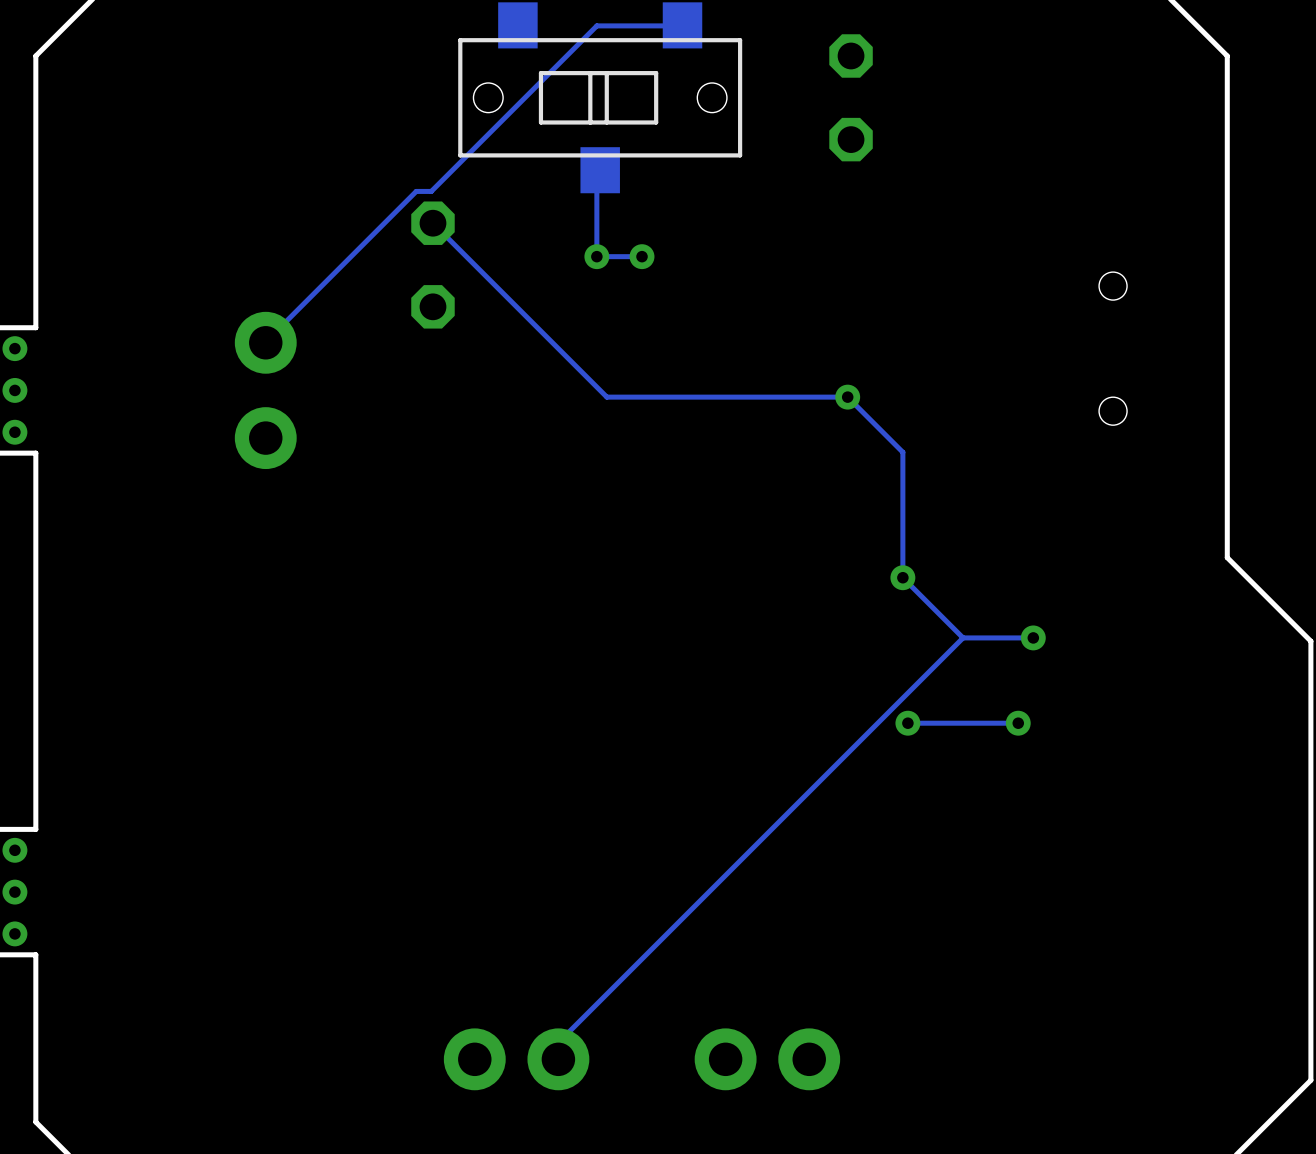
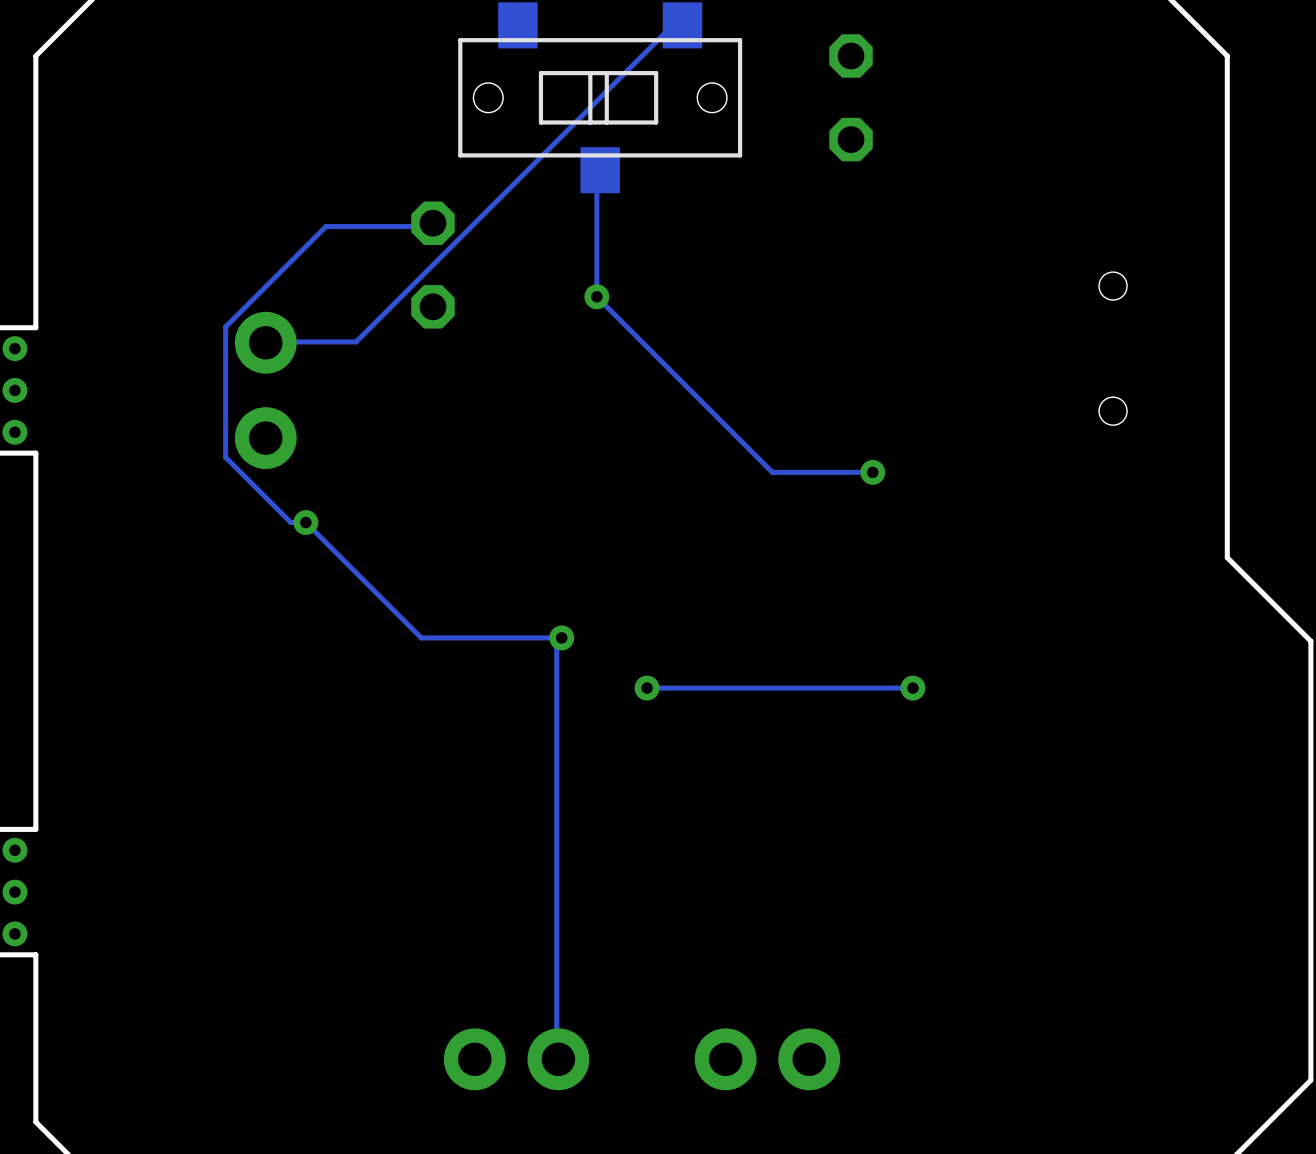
track: (672, 25) (596, 25) (431, 191) (416, 191) (265, 341) -> (672, 25) (356, 341) (265, 341)
track: (432, 223) (606, 397) (847, 397) (902, 452) (902, 577) (963, 637) -> (432, 223) (431, 226) (325, 226) (225, 326) (225, 457) (290, 522) (305, 522) (421, 637) (561, 637)
via: (596, 256) -> none
track: (642, 256) (596, 256) -> (872, 472) (772, 472) (596, 296) (596, 256)
via: (642, 256) -> none
via: none -> (596, 296)
via: (847, 397) -> none
via: none -> (872, 472)
via: none -> (305, 522)
via: (902, 577) -> none
via: none -> (561, 637)
track: (963, 637) (561, 1039) (561, 1059) (558, 1059) -> (556, 637) (556, 1059) (558, 1059)
track: (1033, 637) (963, 637) -> none
via: (1033, 637) -> none
via: none -> (647, 688)
track: none -> (912, 688) (647, 688)
via position: (907, 723) -> (912, 688)
track: (1018, 723) (907, 723) -> none
via: (1018, 723) -> none

